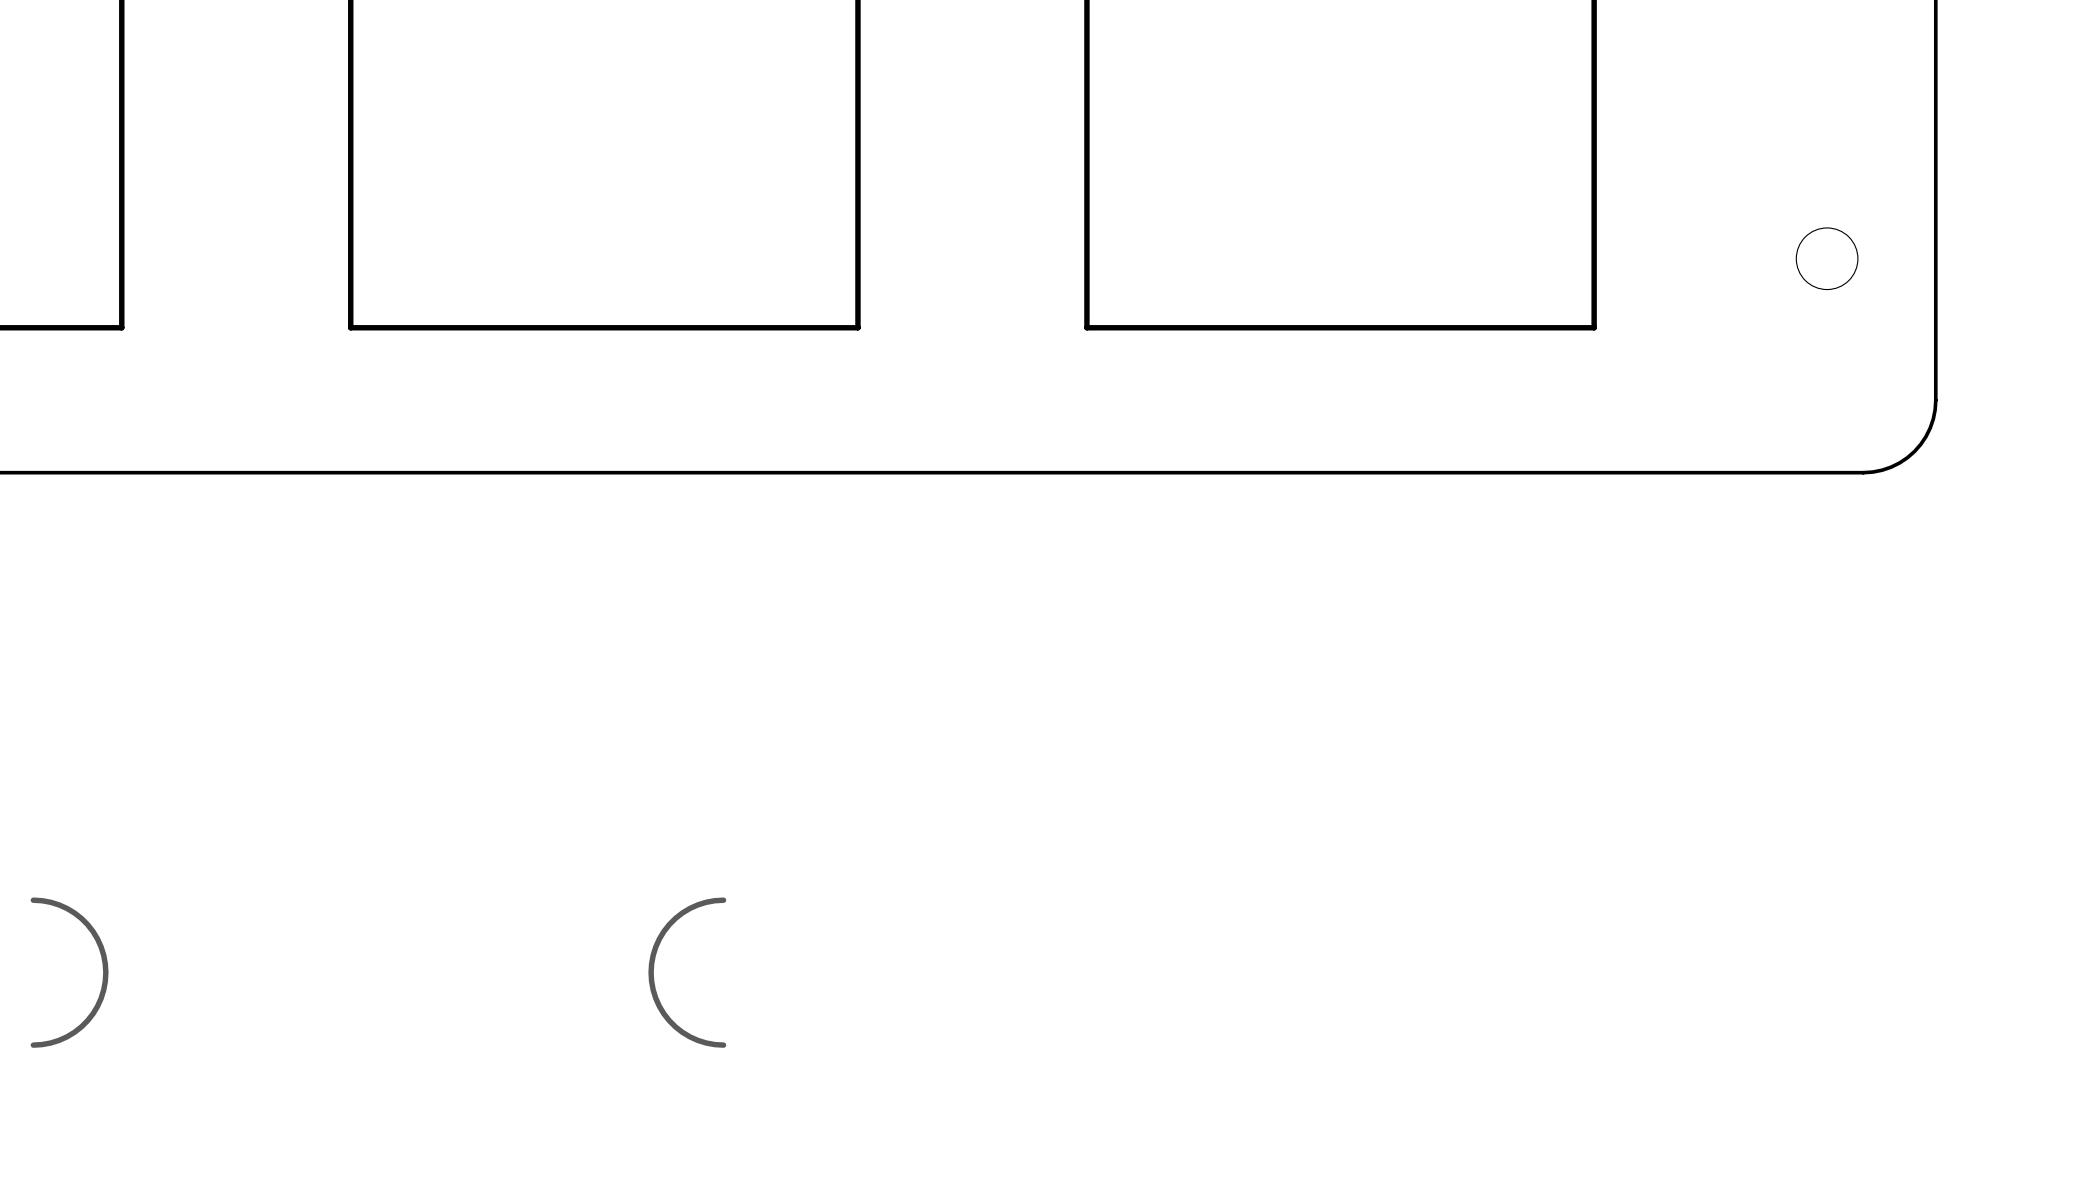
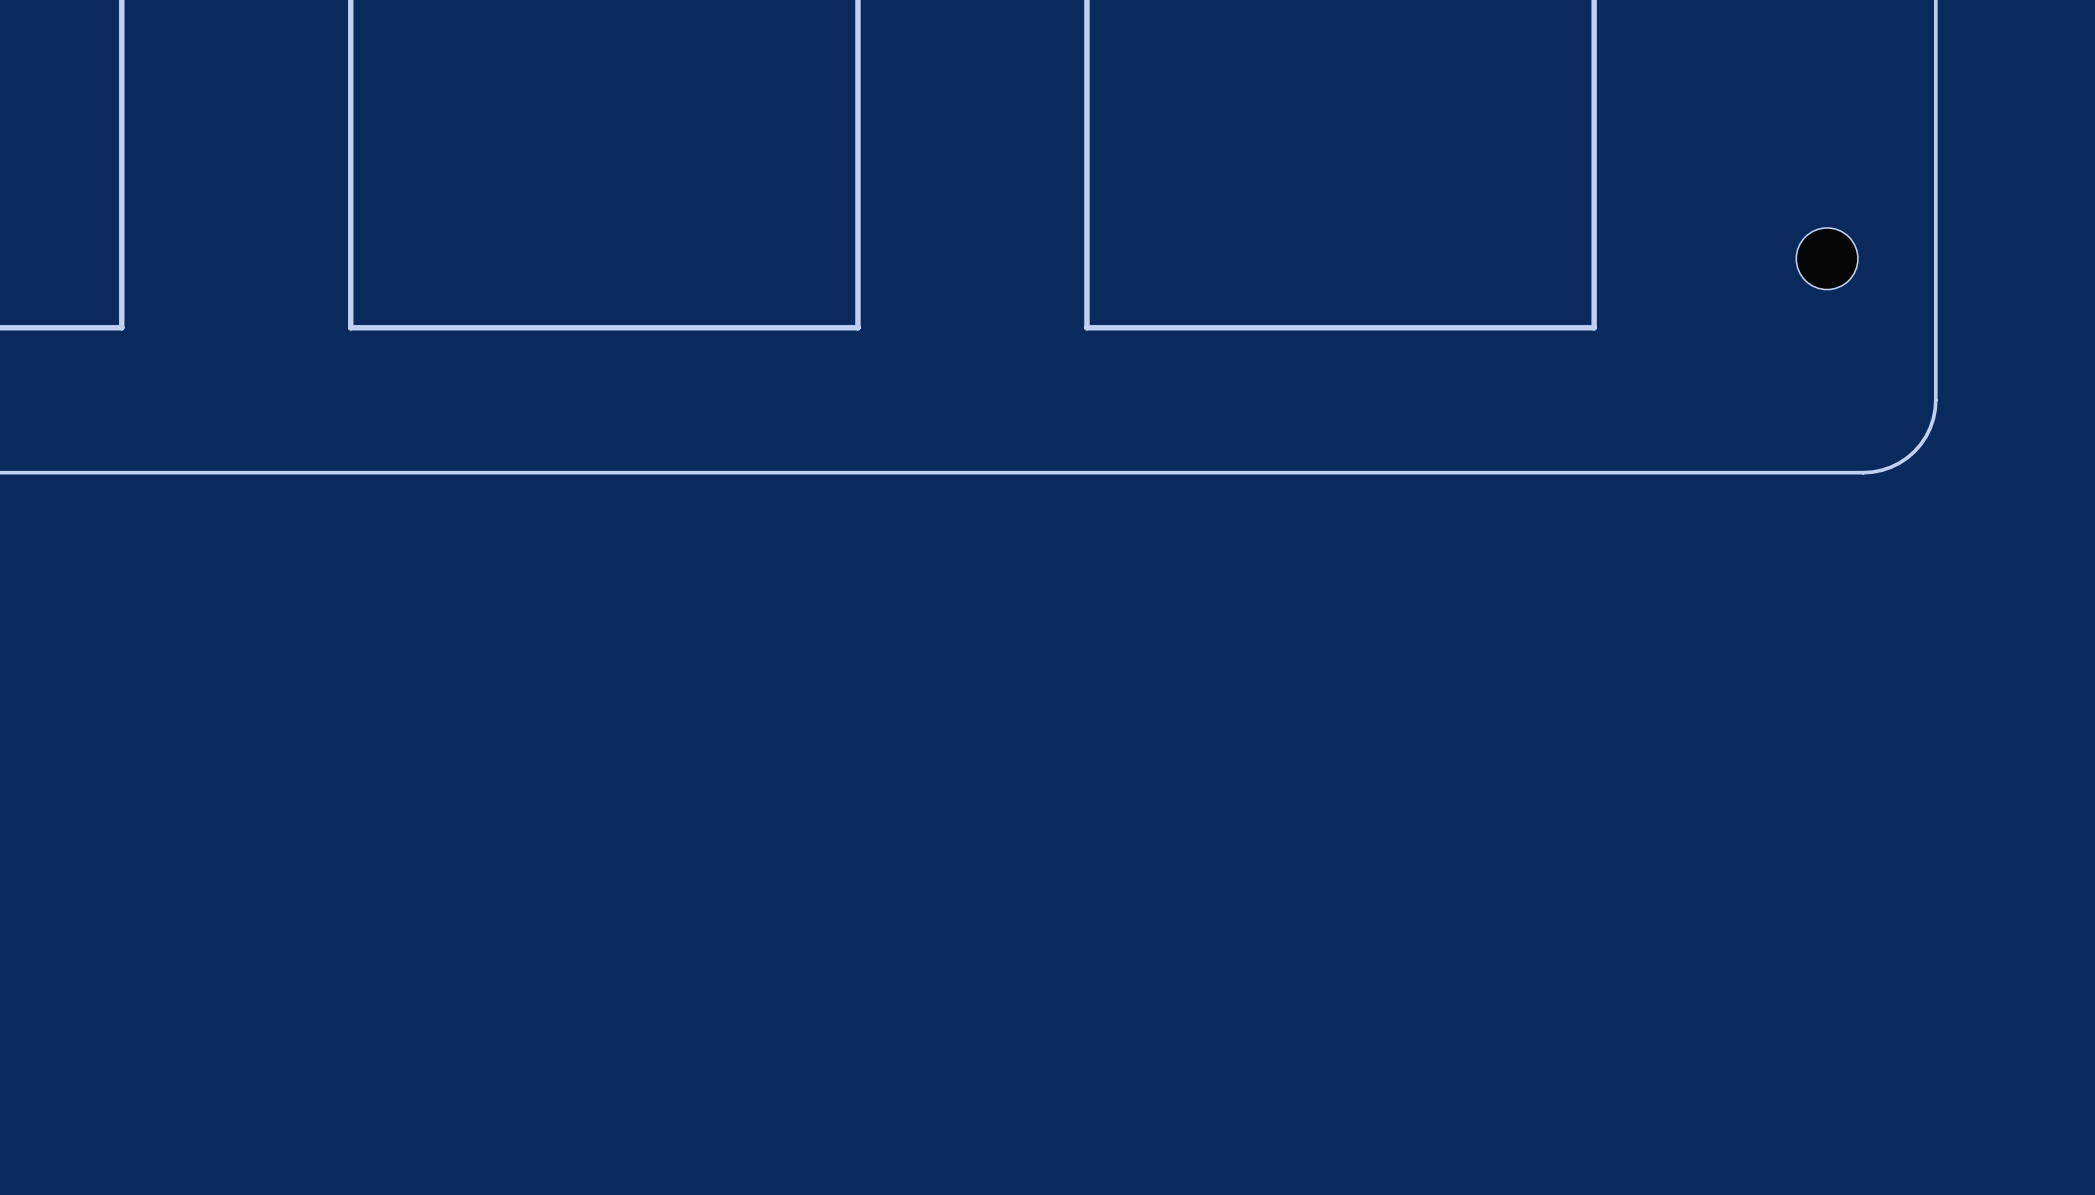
line: (33, 900) (59, 904) (74, 913) (87, 924) (101, 946) (105, 972) (101, 998) (87, 1020) (67, 1036) (50, 1043) (33, 1045) -> none
line: (723, 900) (697, 904) (675, 918) (659, 938) (653, 955) (651, 972) (655, 998) (669, 1020) (689, 1036) (706, 1043) (723, 1045) -> none

